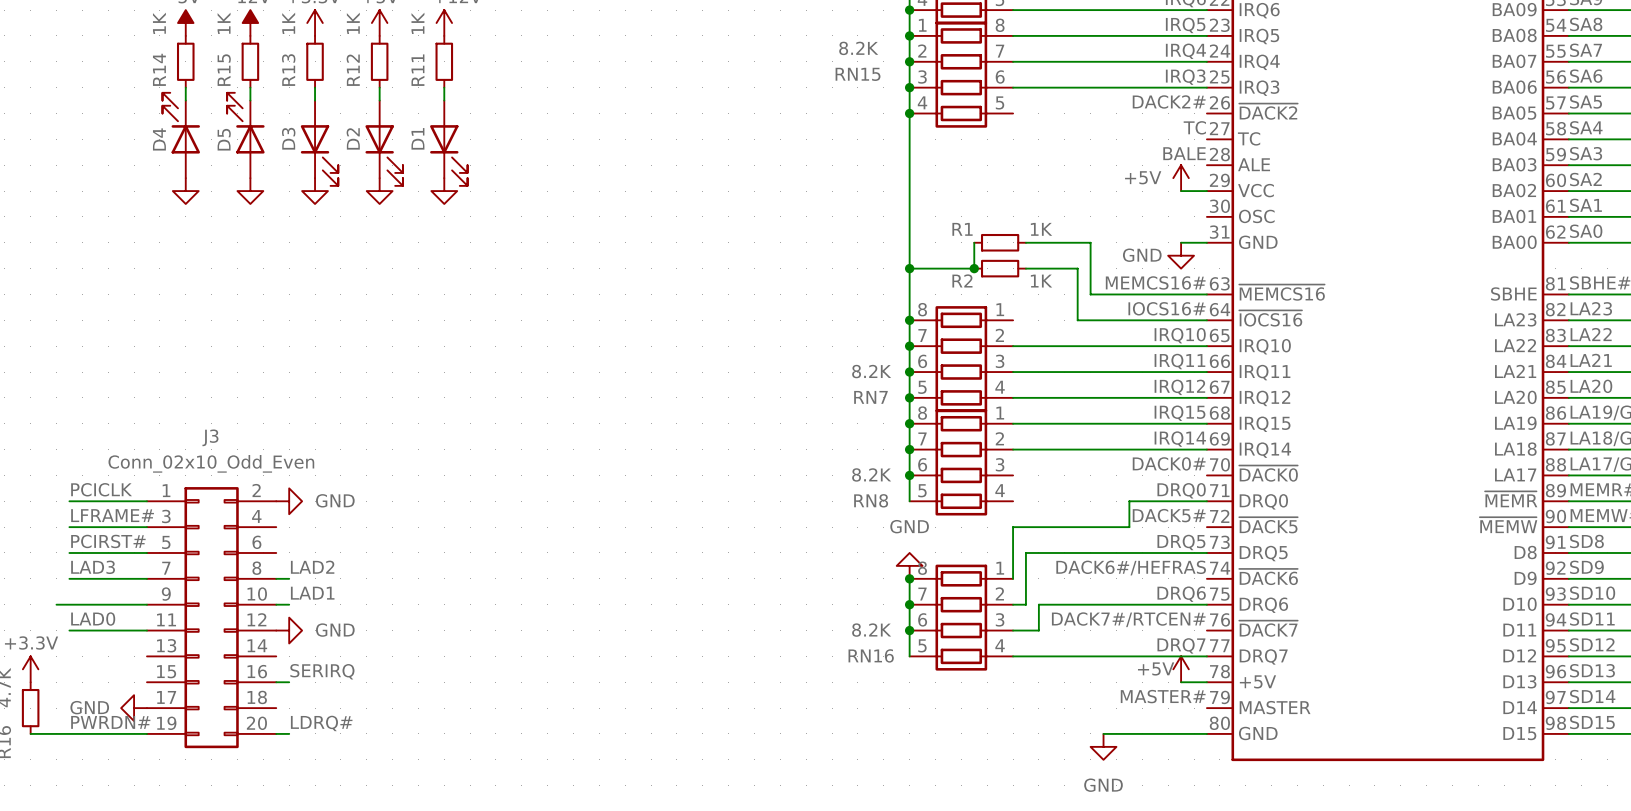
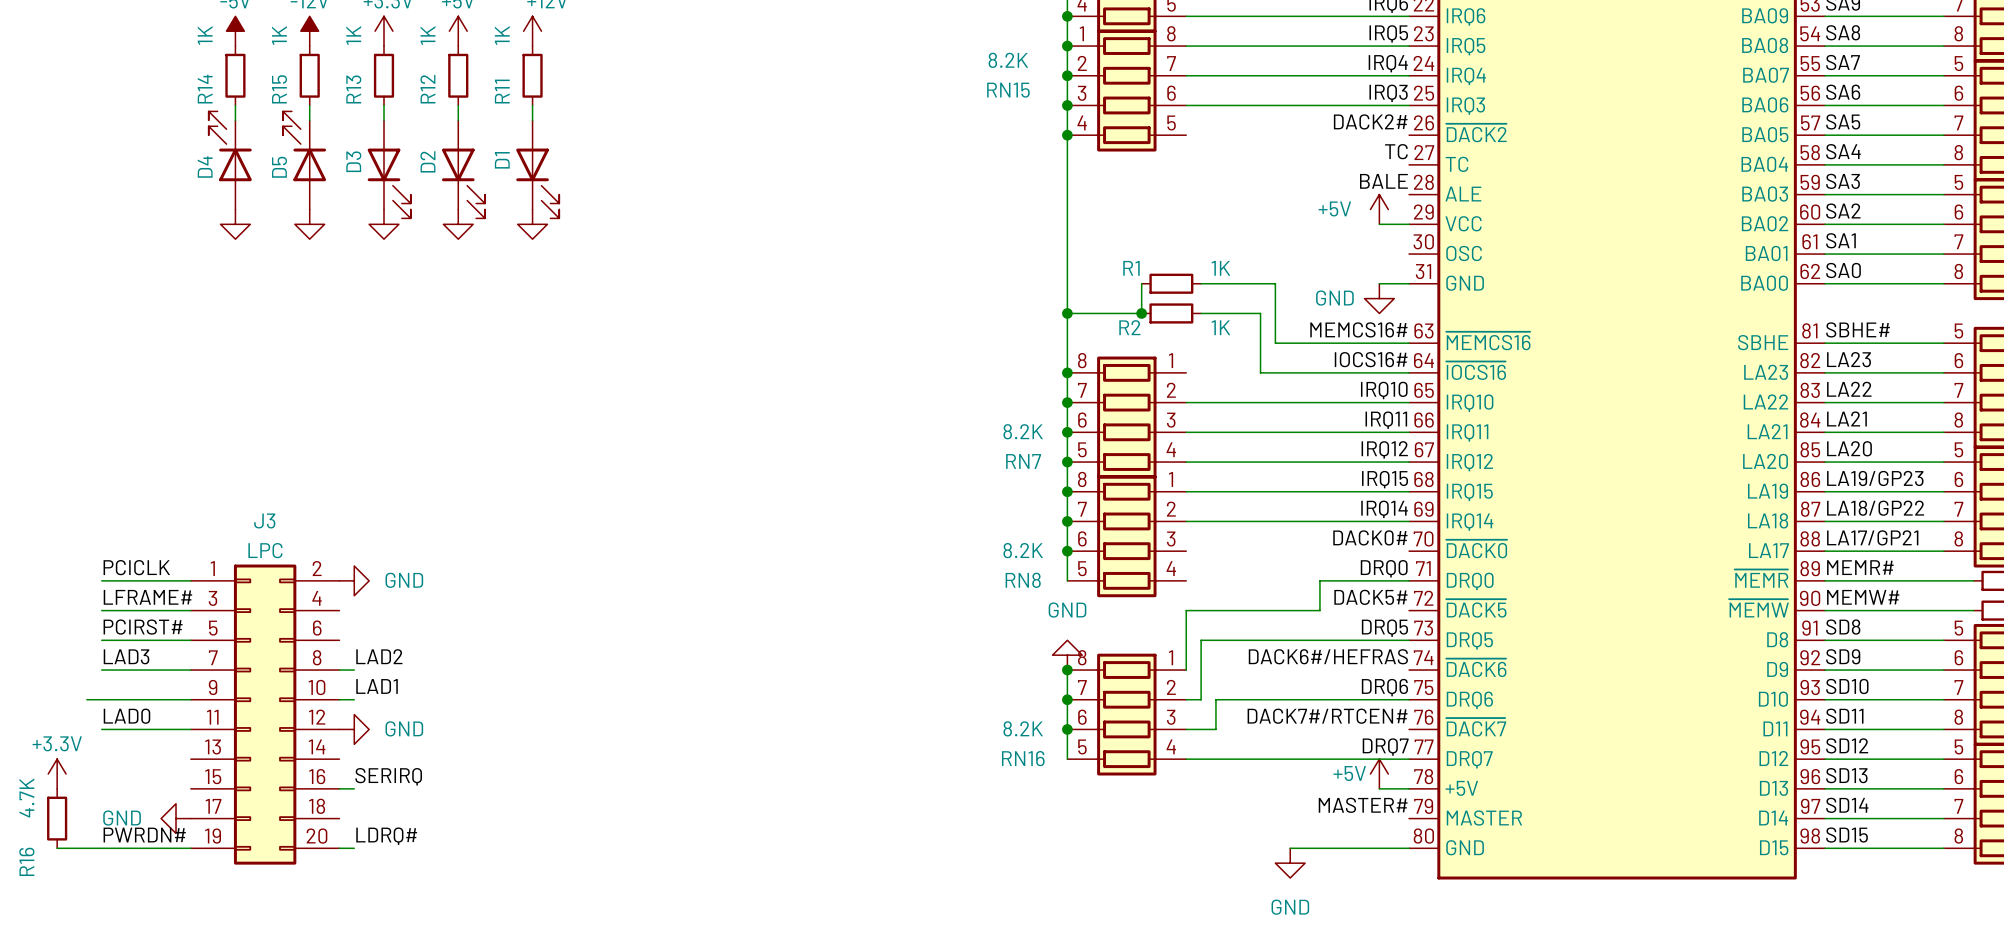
J3 name position: J3 (210, 437) -> J3 (264, 520)
J3 value: Conn_02x10_Odd_Even (211, 463) -> LPC (265, 550)

